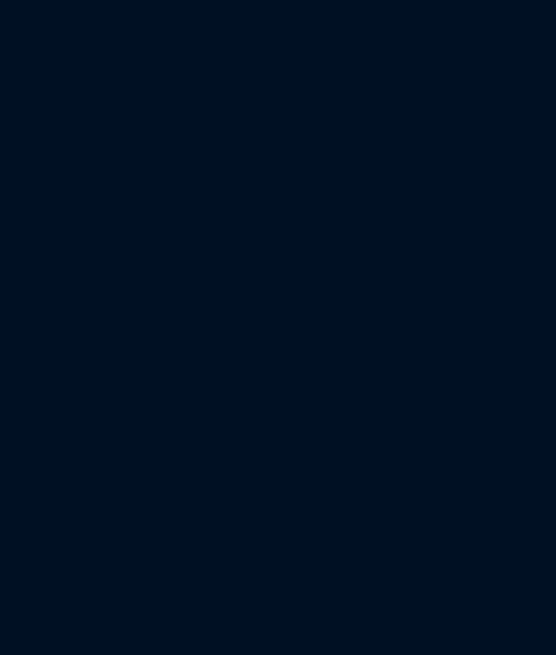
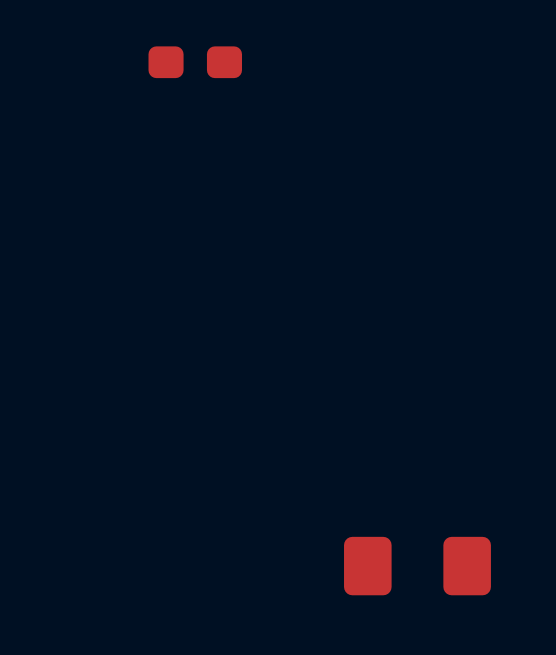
part: none -> (195, 62)
part: none -> (417, 566)

